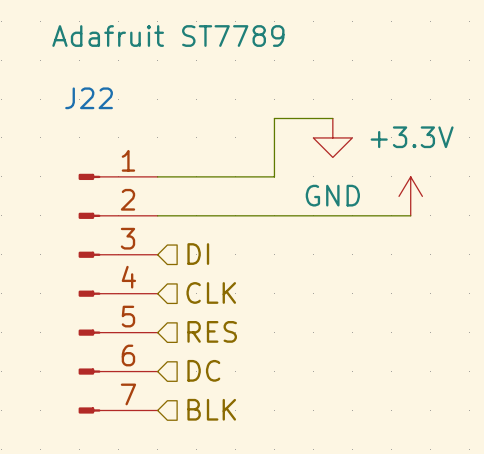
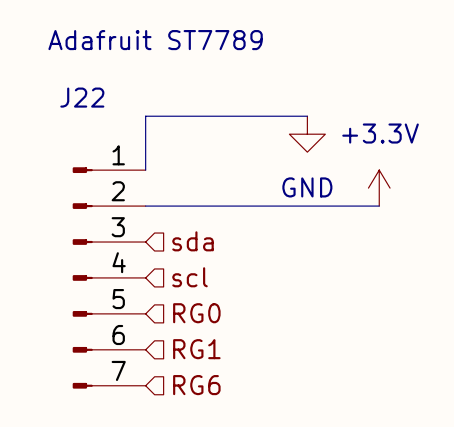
wire: (274, 118) (274, 176) (157, 176) -> (253, 116) (145, 116) (145, 170)
hierarchical label: DI (198, 254) -> sda (192, 241)
hierarchical label: CLK (211, 292) -> scl (190, 277)
hierarchical label: RES (212, 331) -> RG0 (196, 313)
hierarchical label: DC (203, 370) -> RG1 (196, 349)
hierarchical label: BLK (211, 409) -> RG6 (196, 385)

